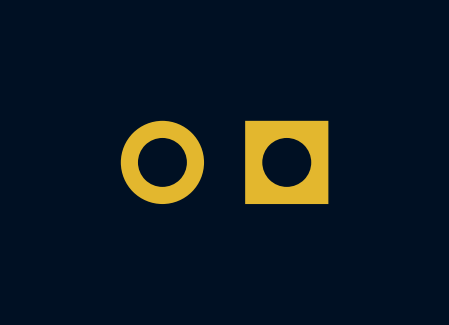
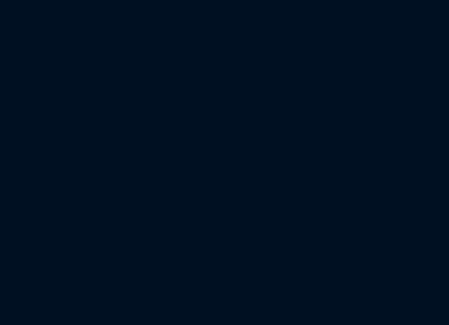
part: (224, 162) -> none

